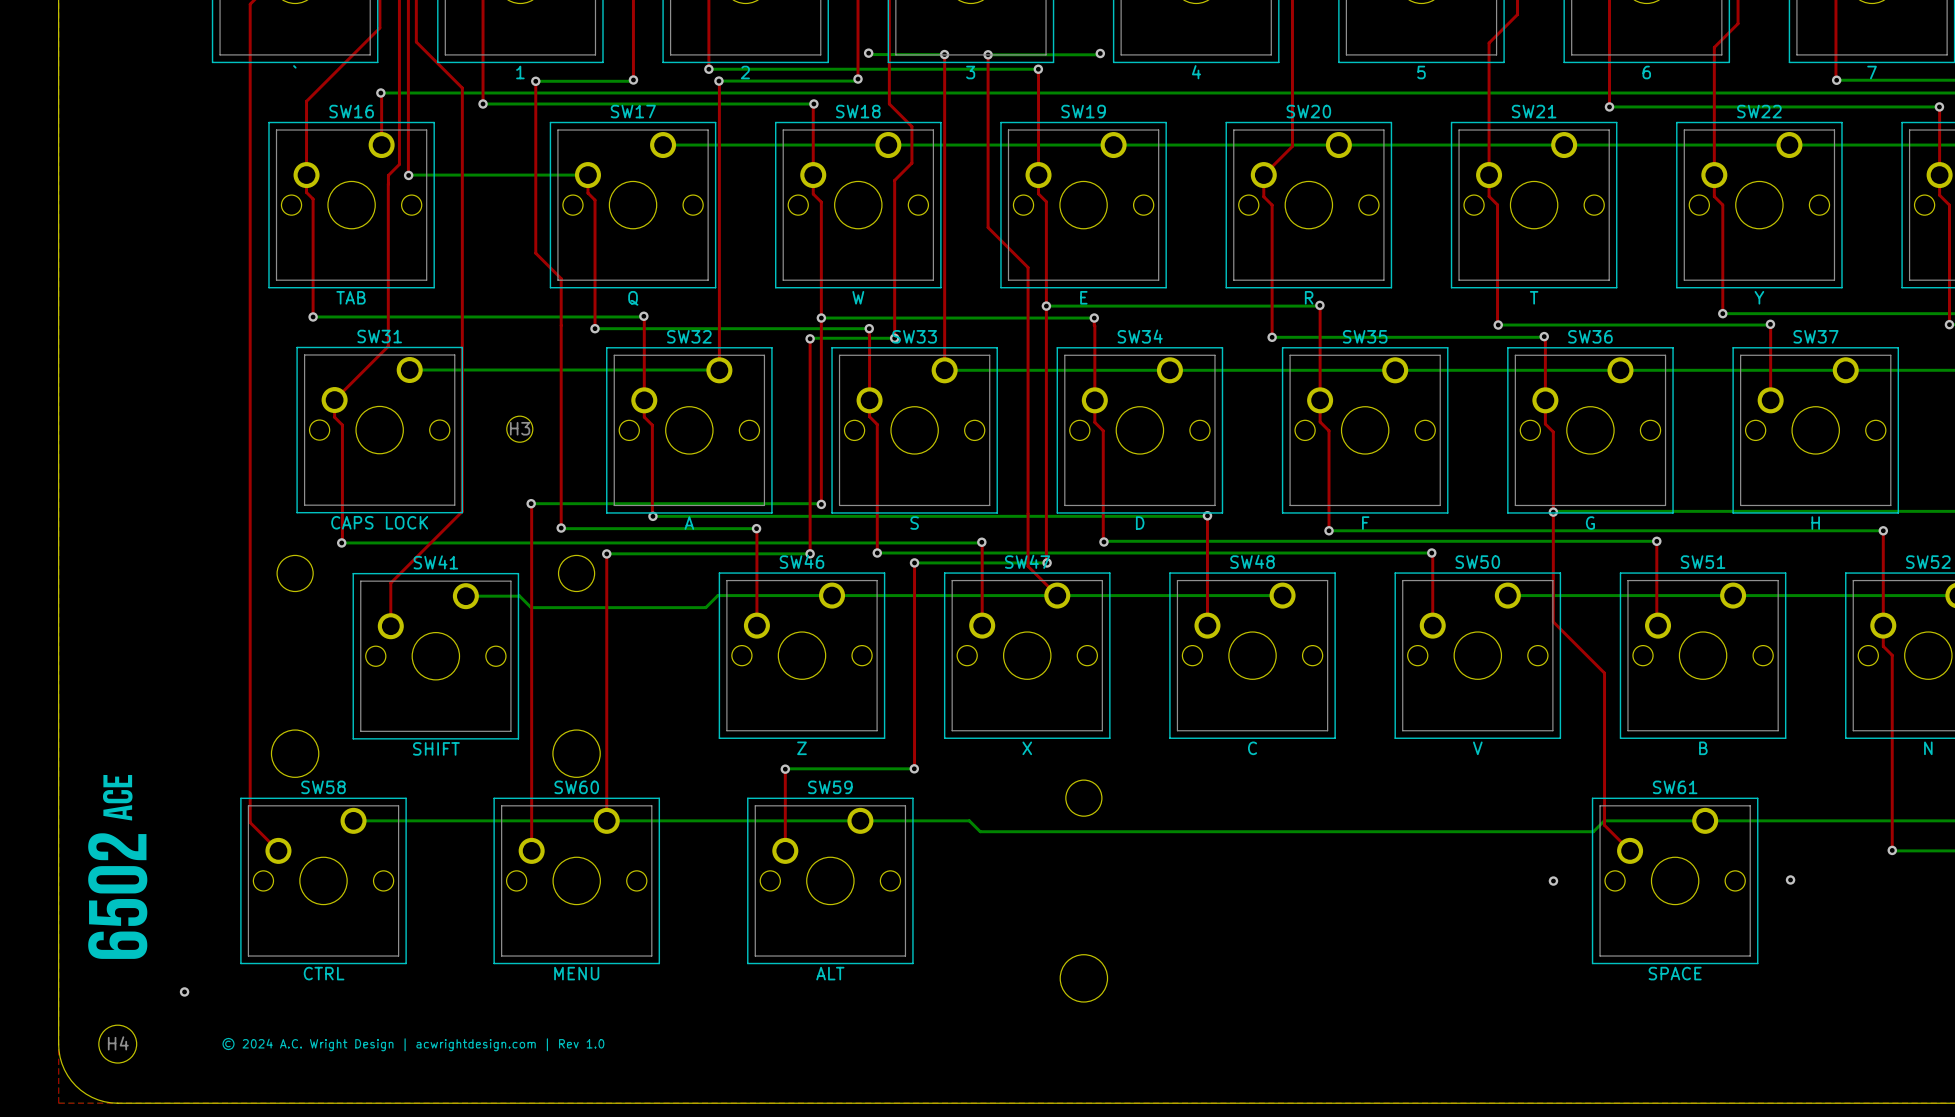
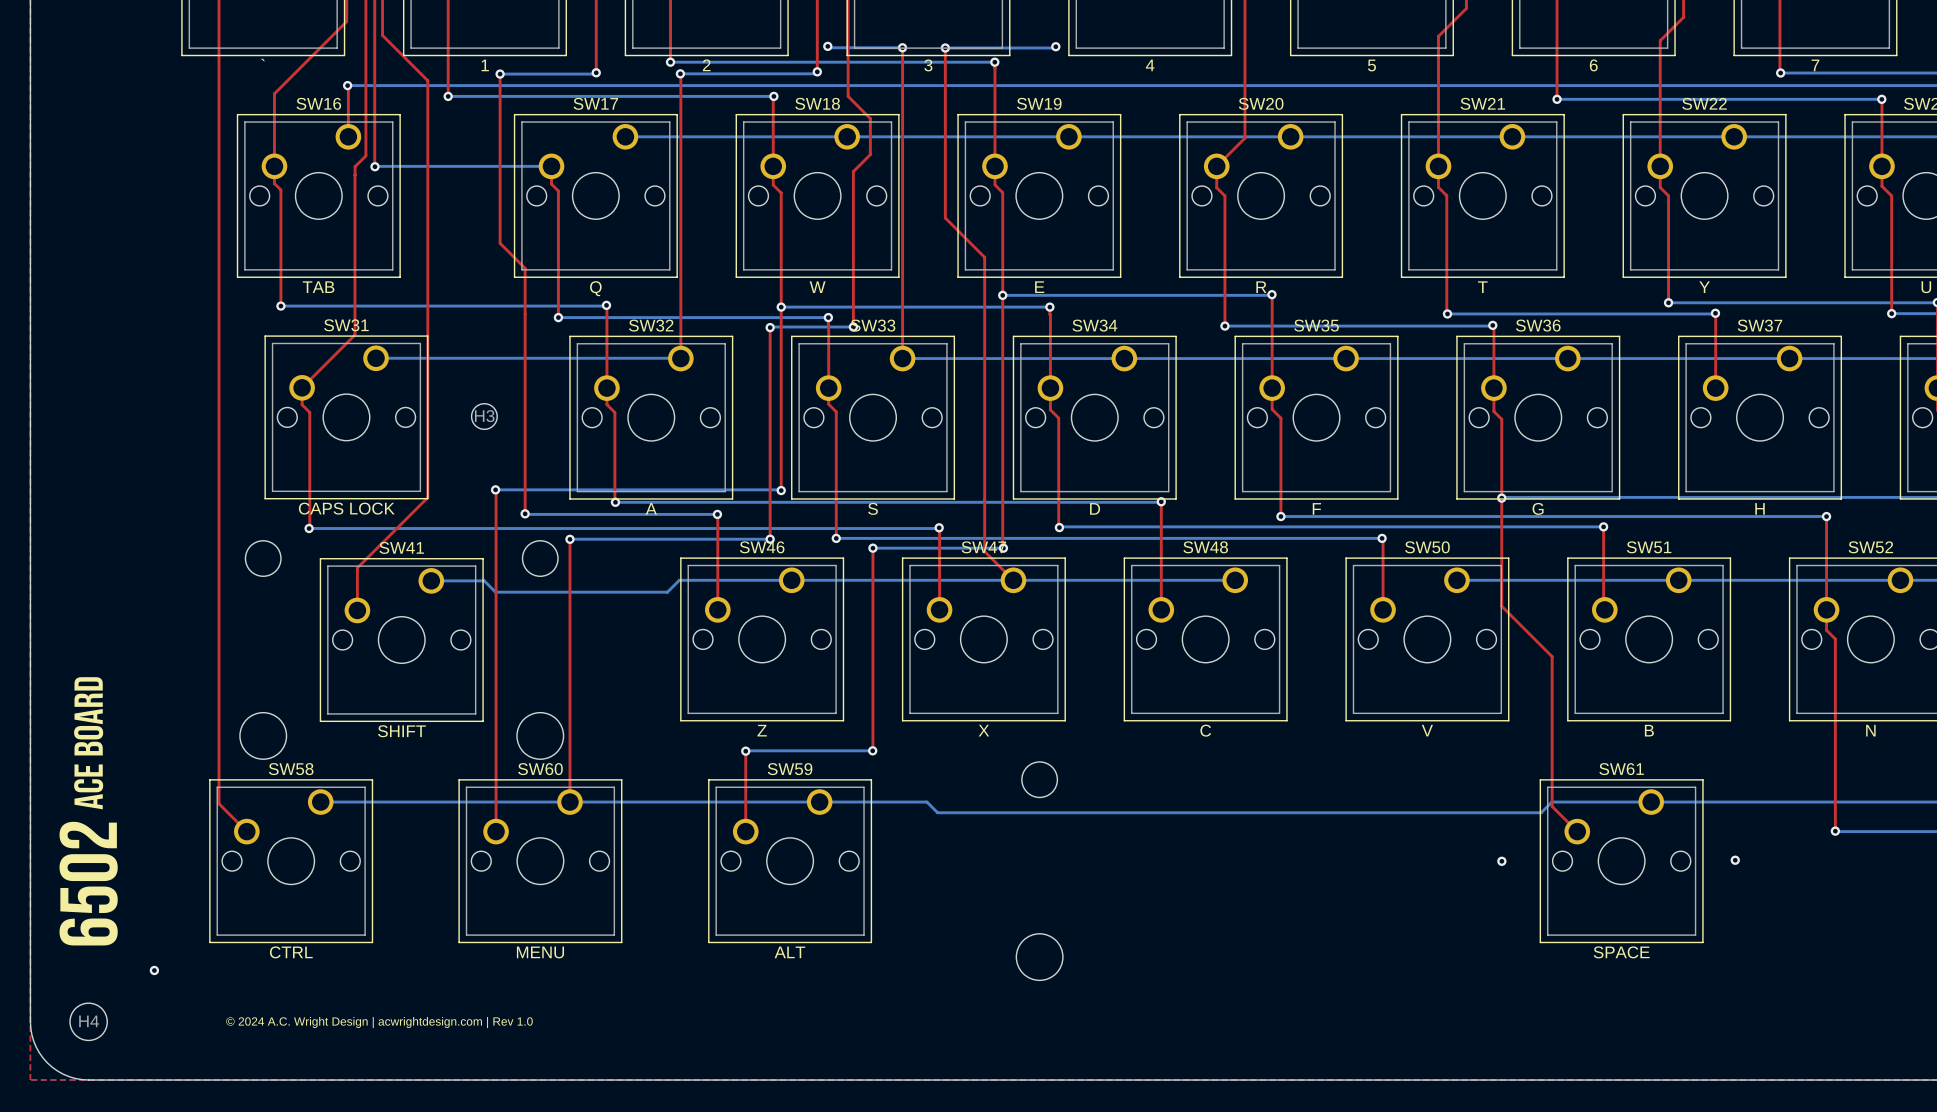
drawing: none -> [59, 677, 118, 946]
drawing: [88, 774, 148, 959] -> none

